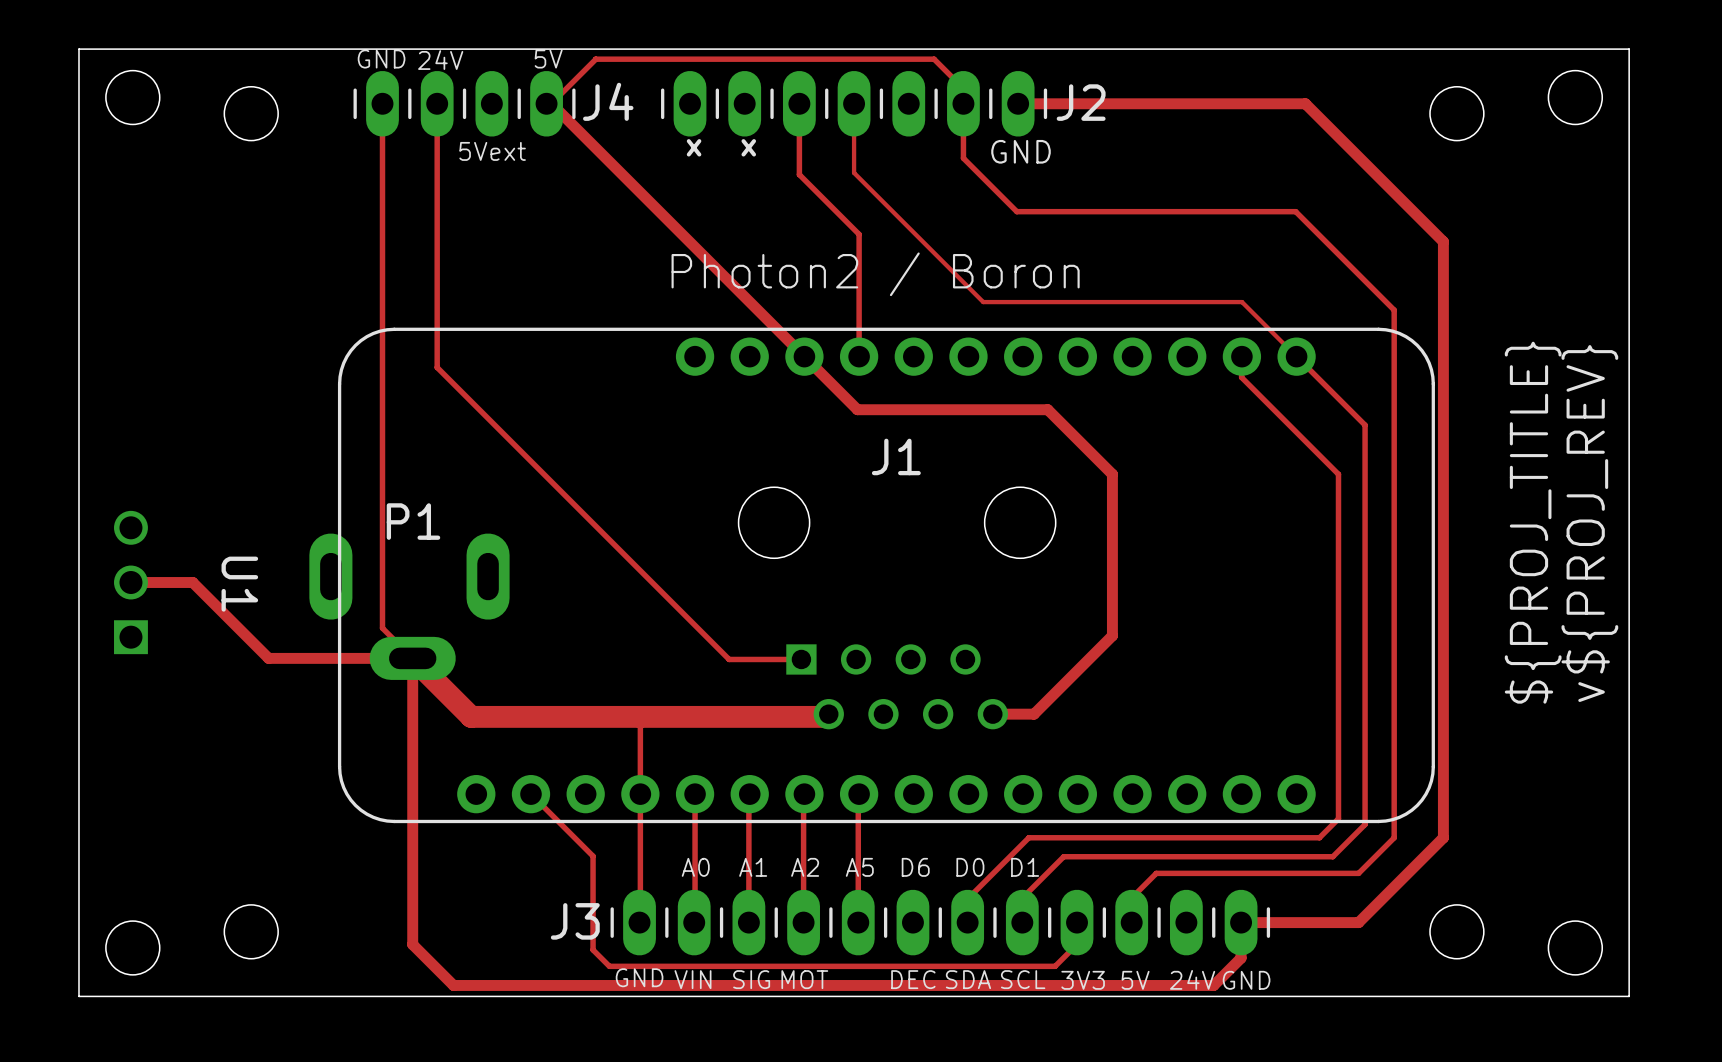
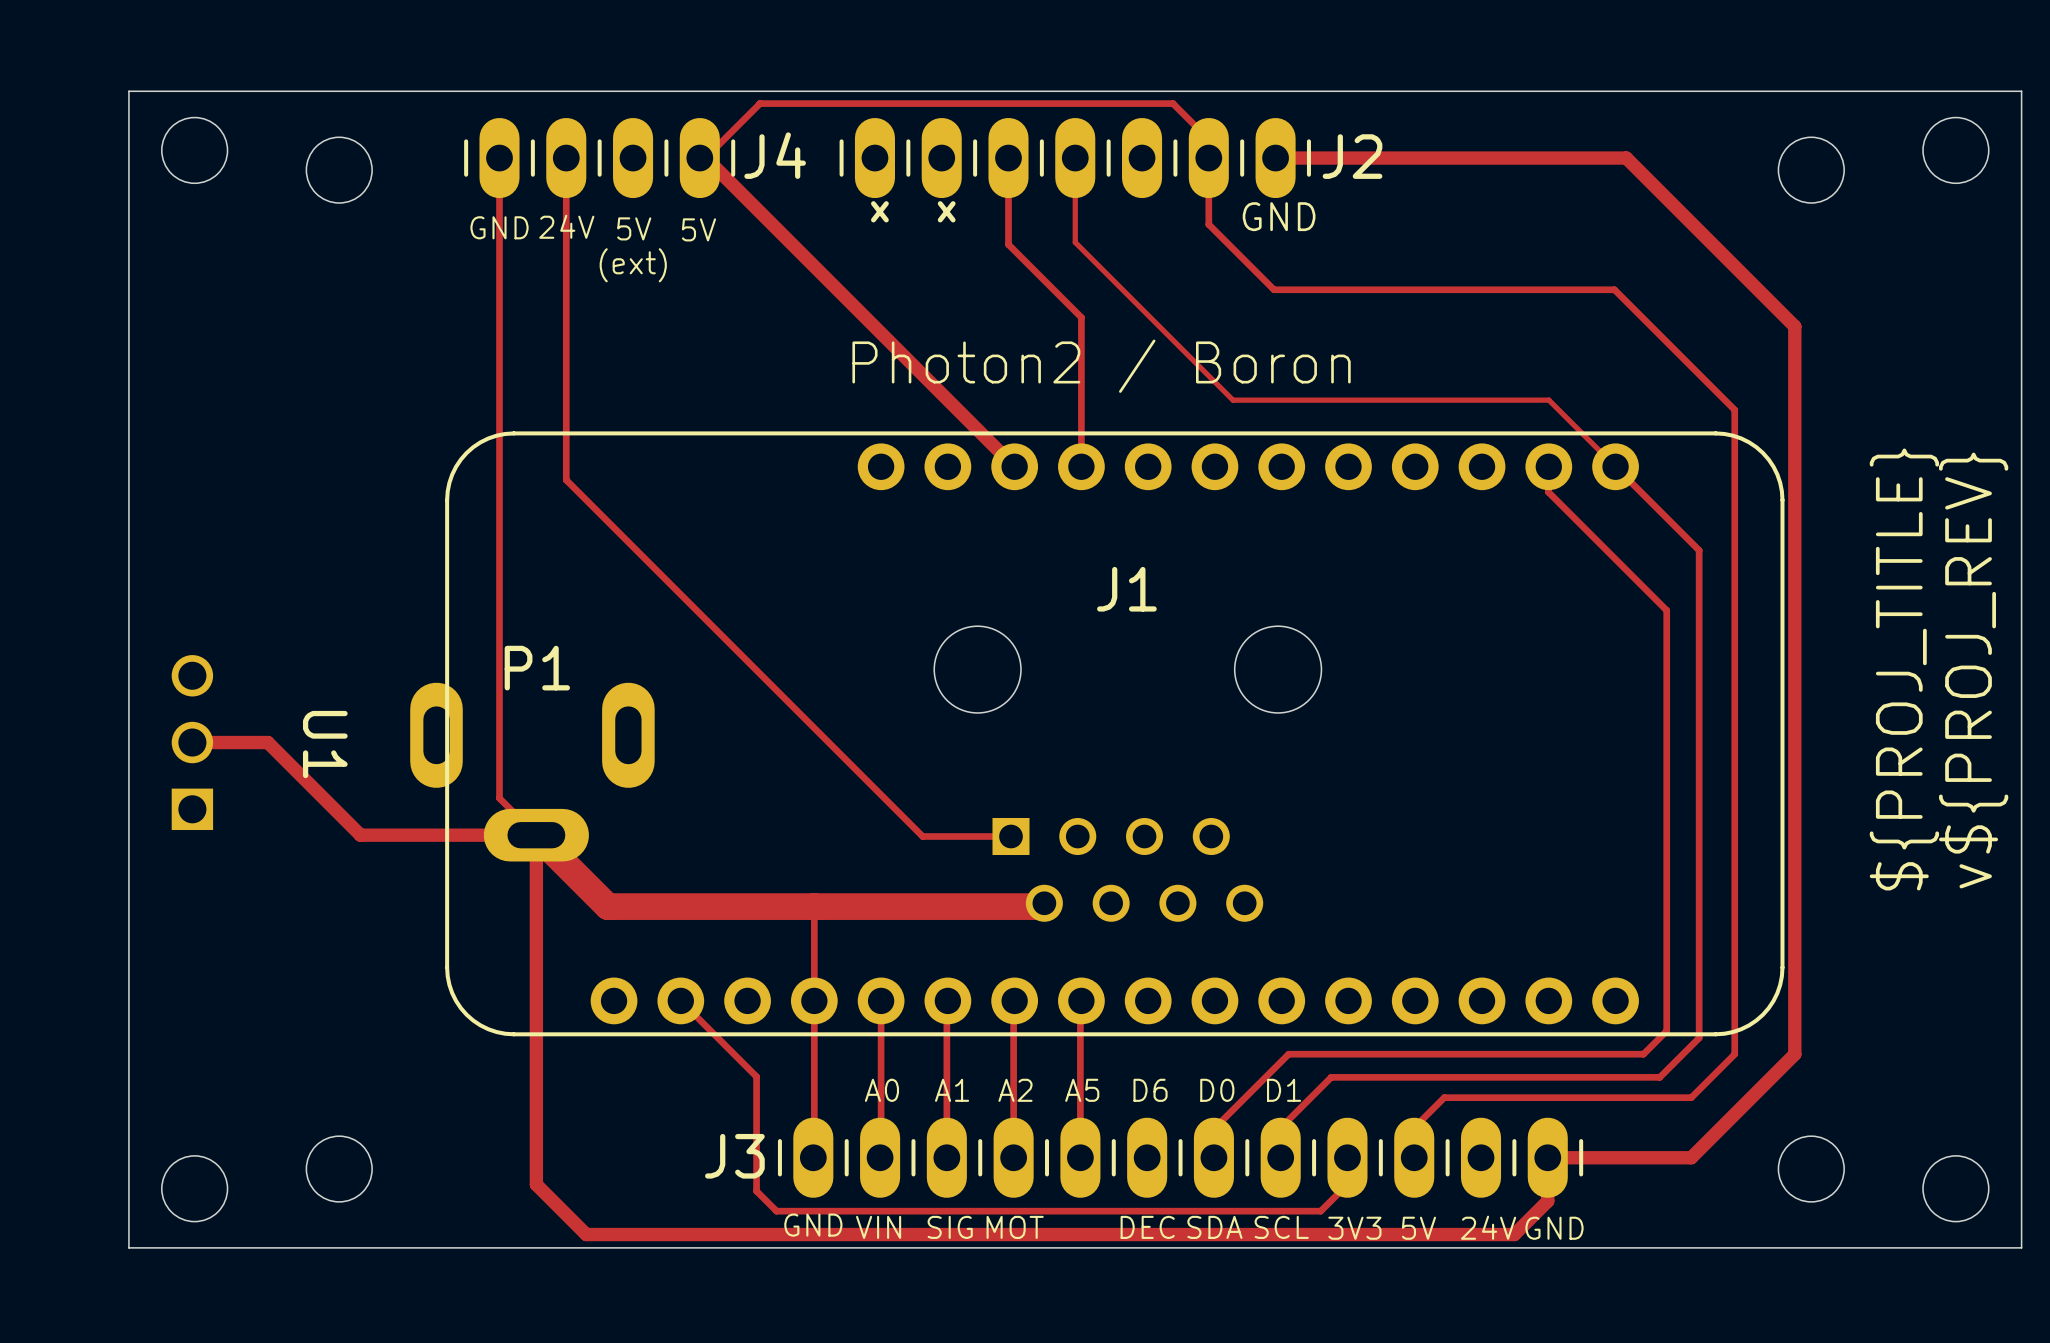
text position: GND (381, 59) -> GND (499, 227)
text: 5V (548, 59) -> none
text position: 24V (440, 60) -> 24V (566, 226)
text: 5Vext (492, 151) -> none
text: none -> 5V (634, 228)
text: none -> 5V (698, 229)
text: none -> (ext) (633, 265)
track: (804, 356) (857, 409) (1047, 409) (1112, 474) (1112, 635) (1034, 714) (992, 714) -> none

